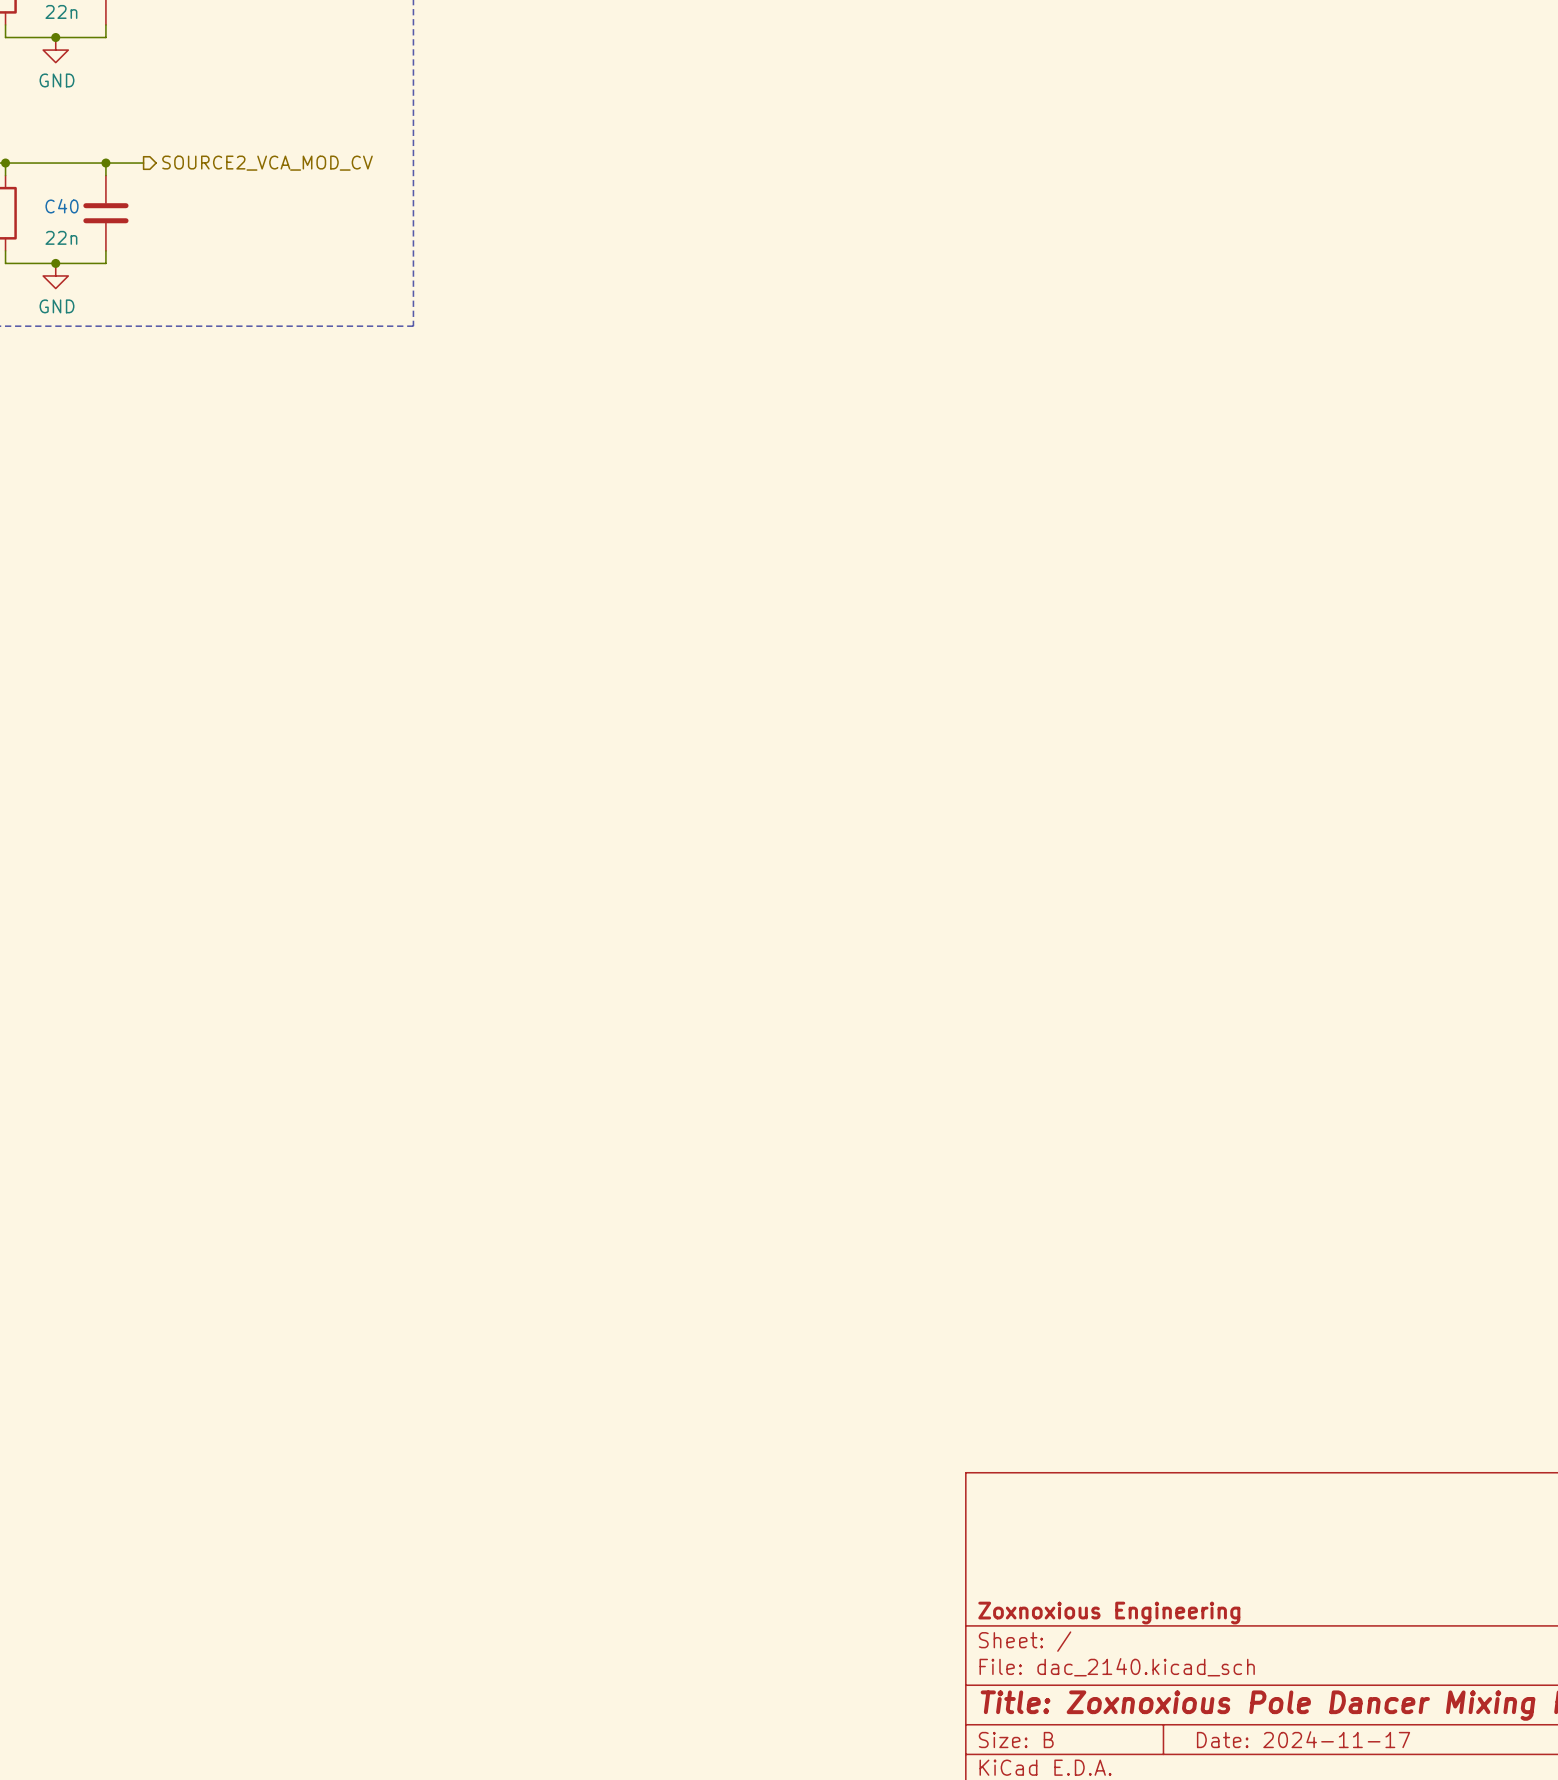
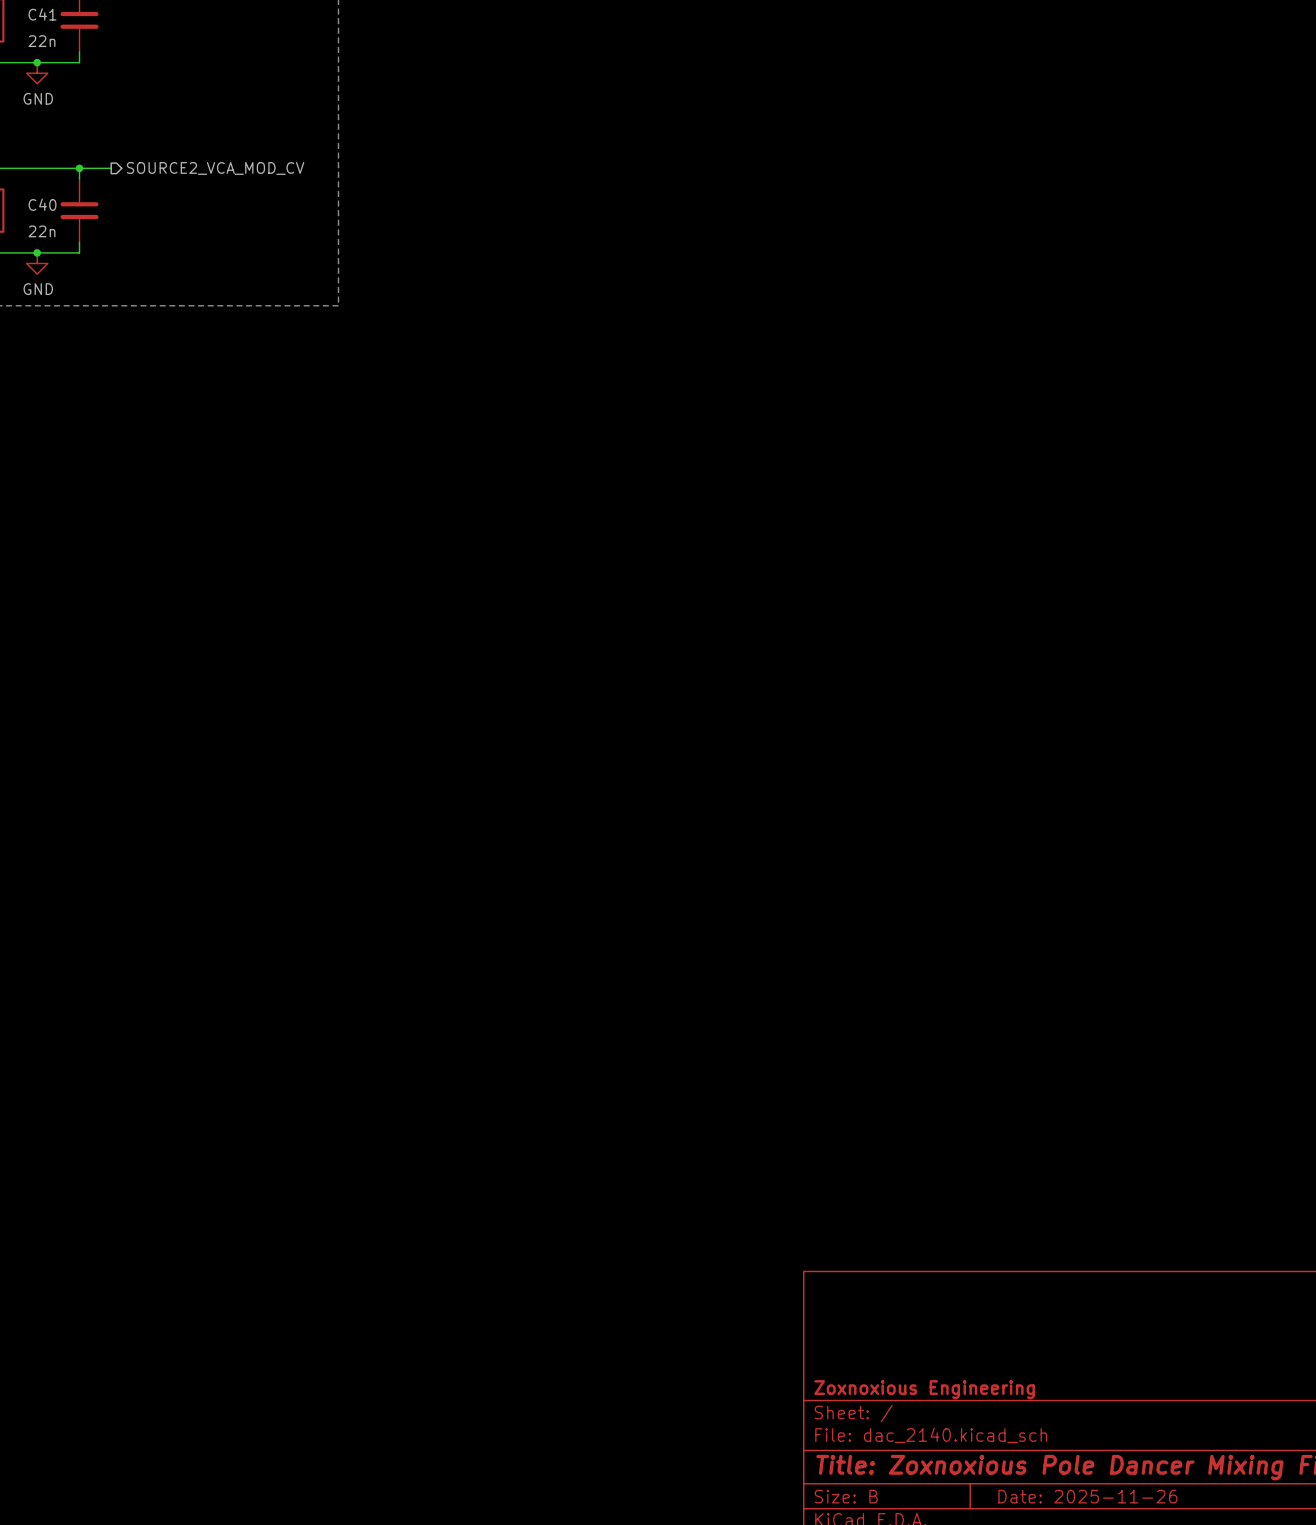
title block: Date: 2024-11-17 (1303, 1739) -> Date: 2025-11-26 (1087, 1496)

